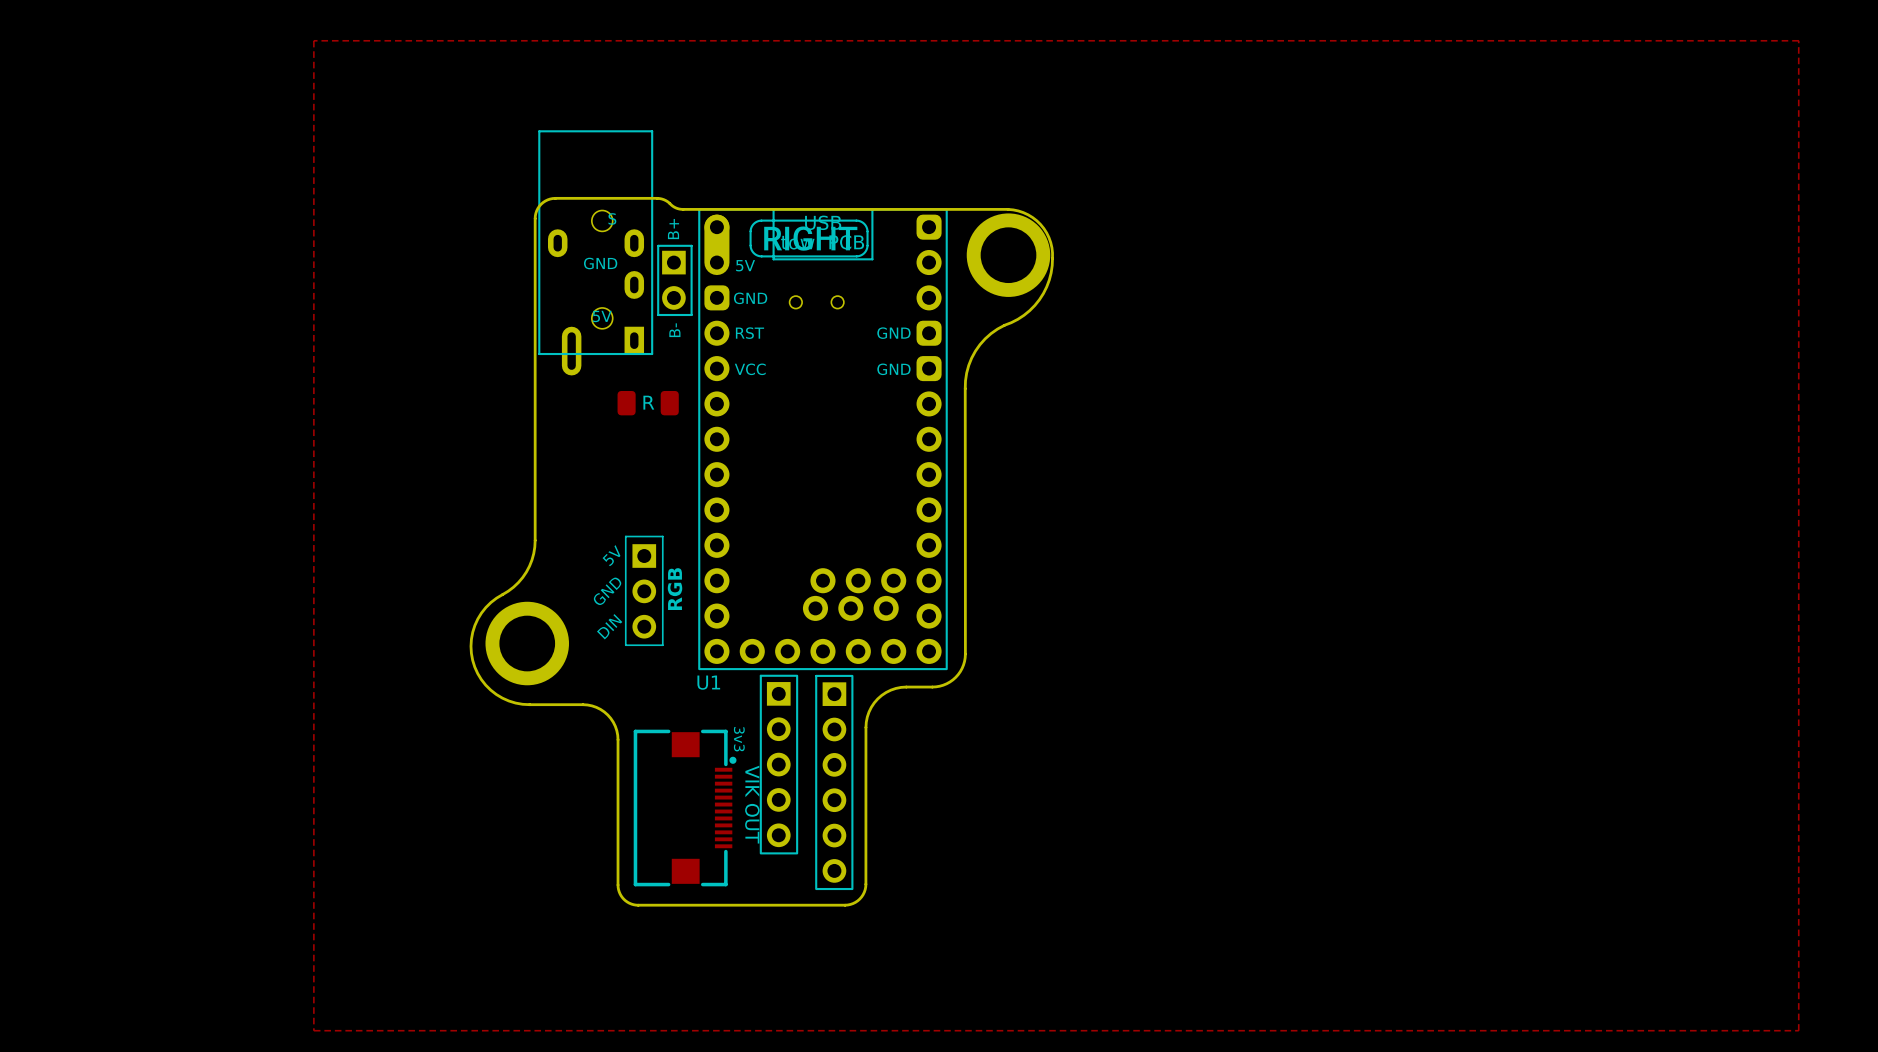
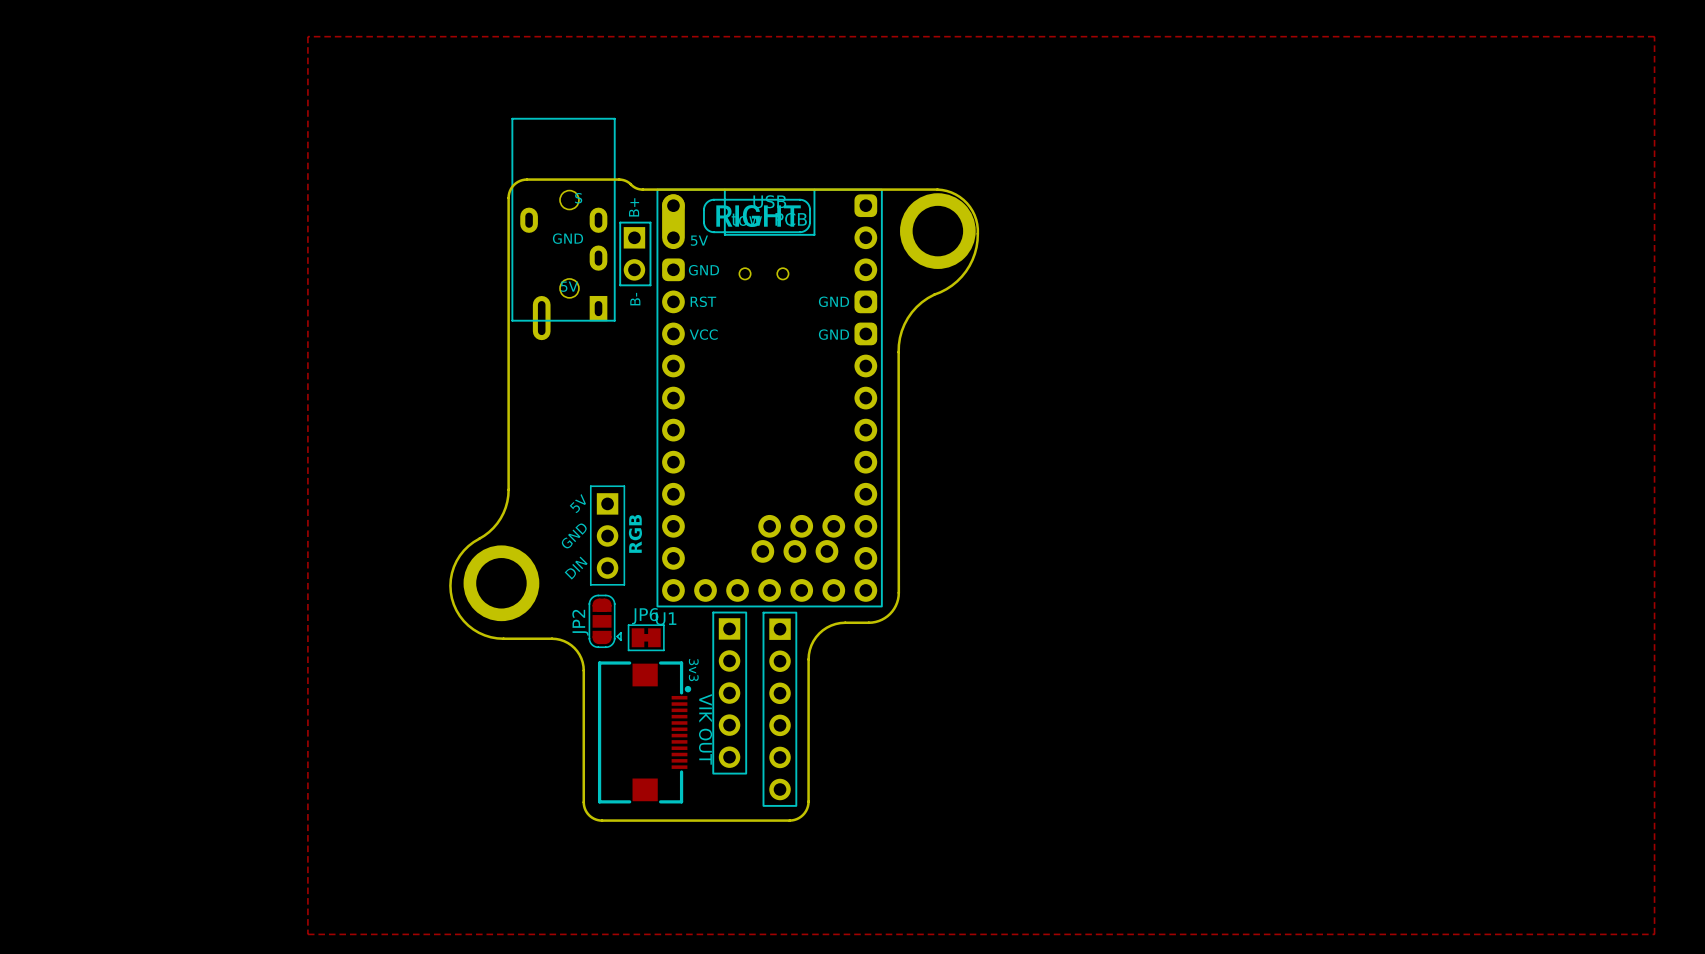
part: (648, 403) -> none
JP2: none -> (605, 621)
JP6: none -> (646, 637)

